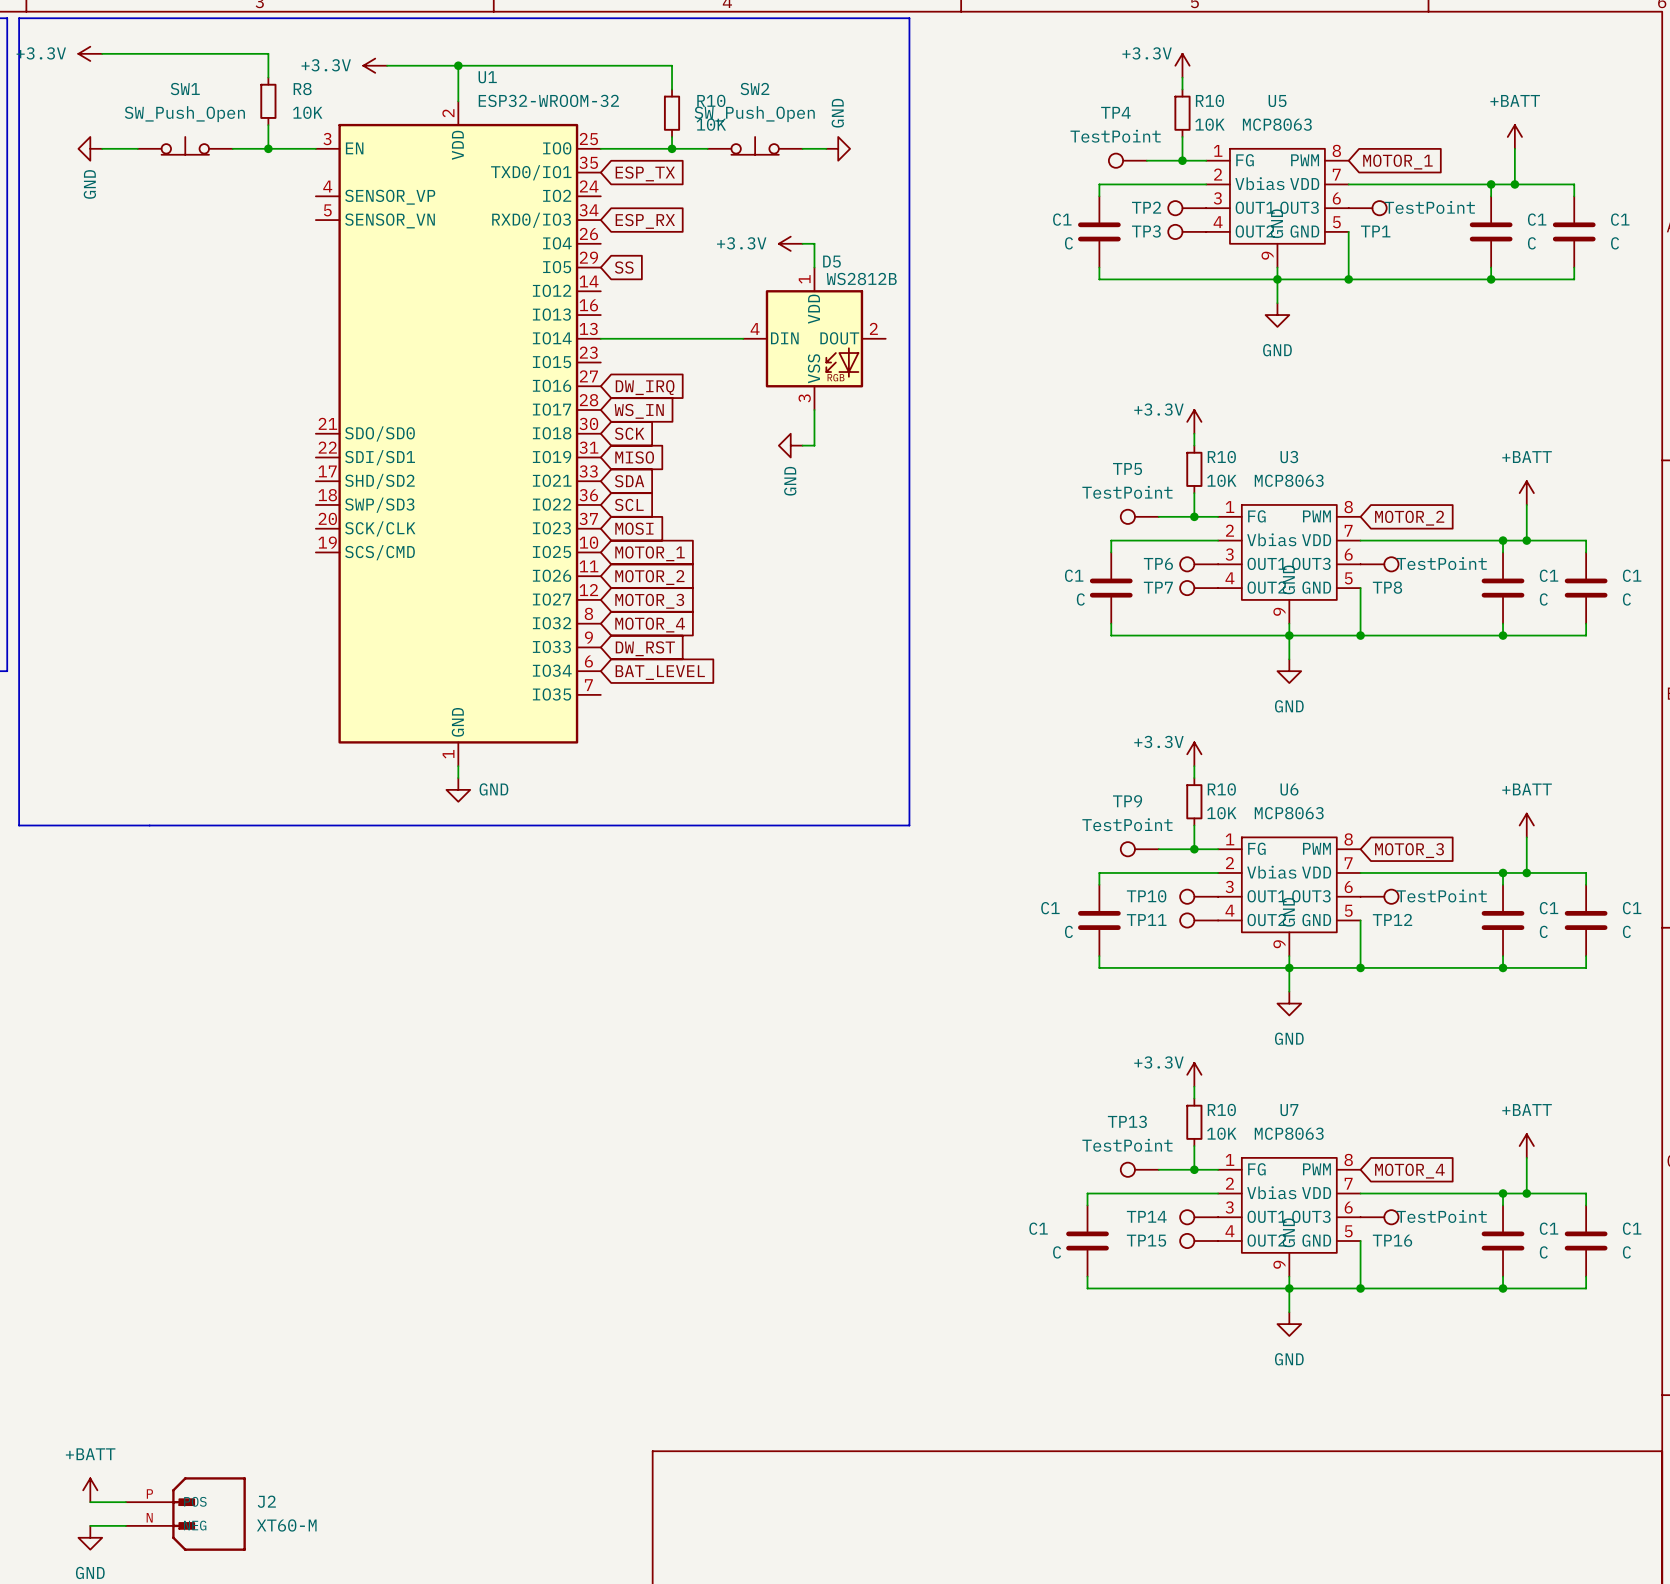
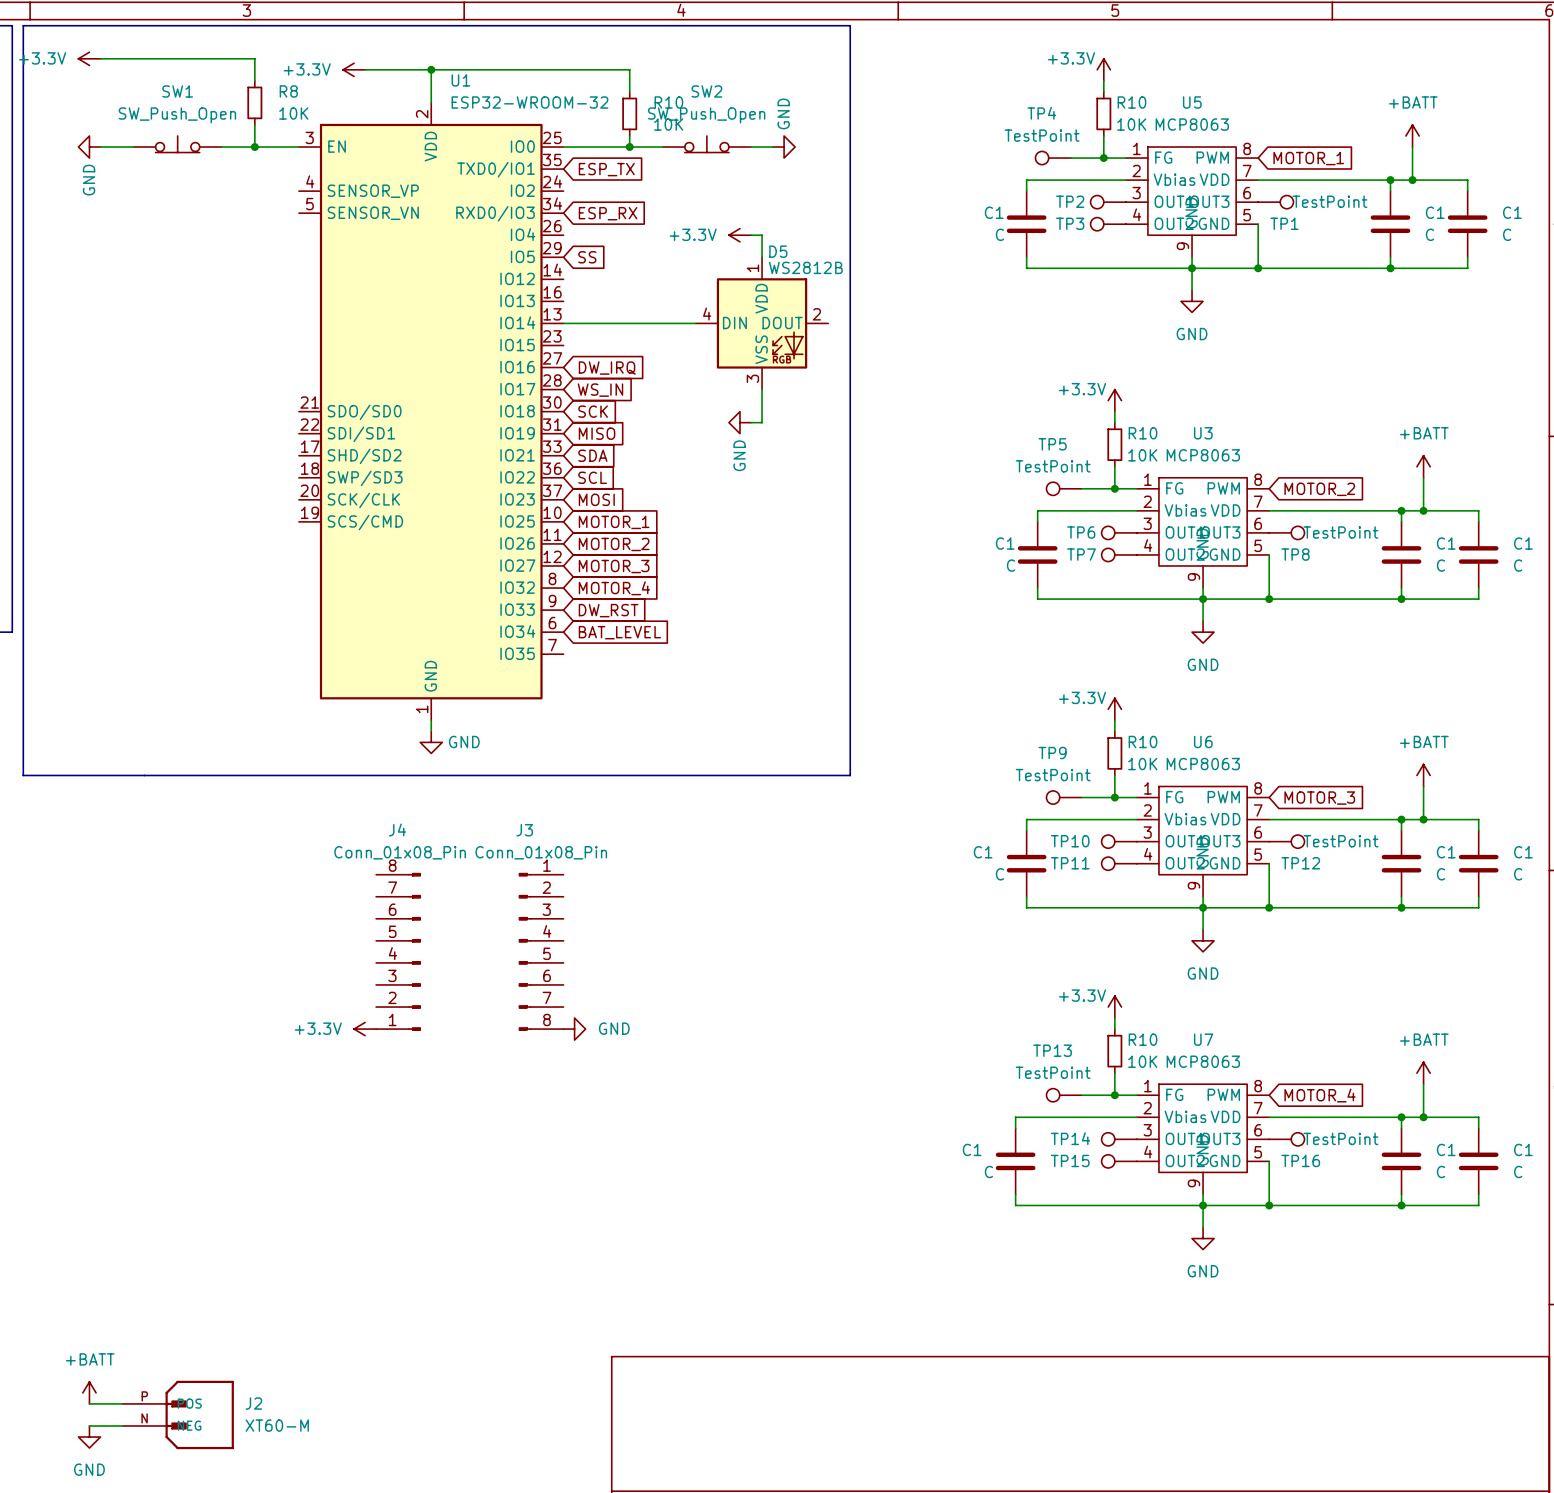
J4: none -> Conn_01x08_Pin (398, 951)
J3: none -> Conn_01x08_Pin (541, 951)
power symbol: none -> +3.3V (365, 1029)
power symbol: none -> GND (574, 1029)

